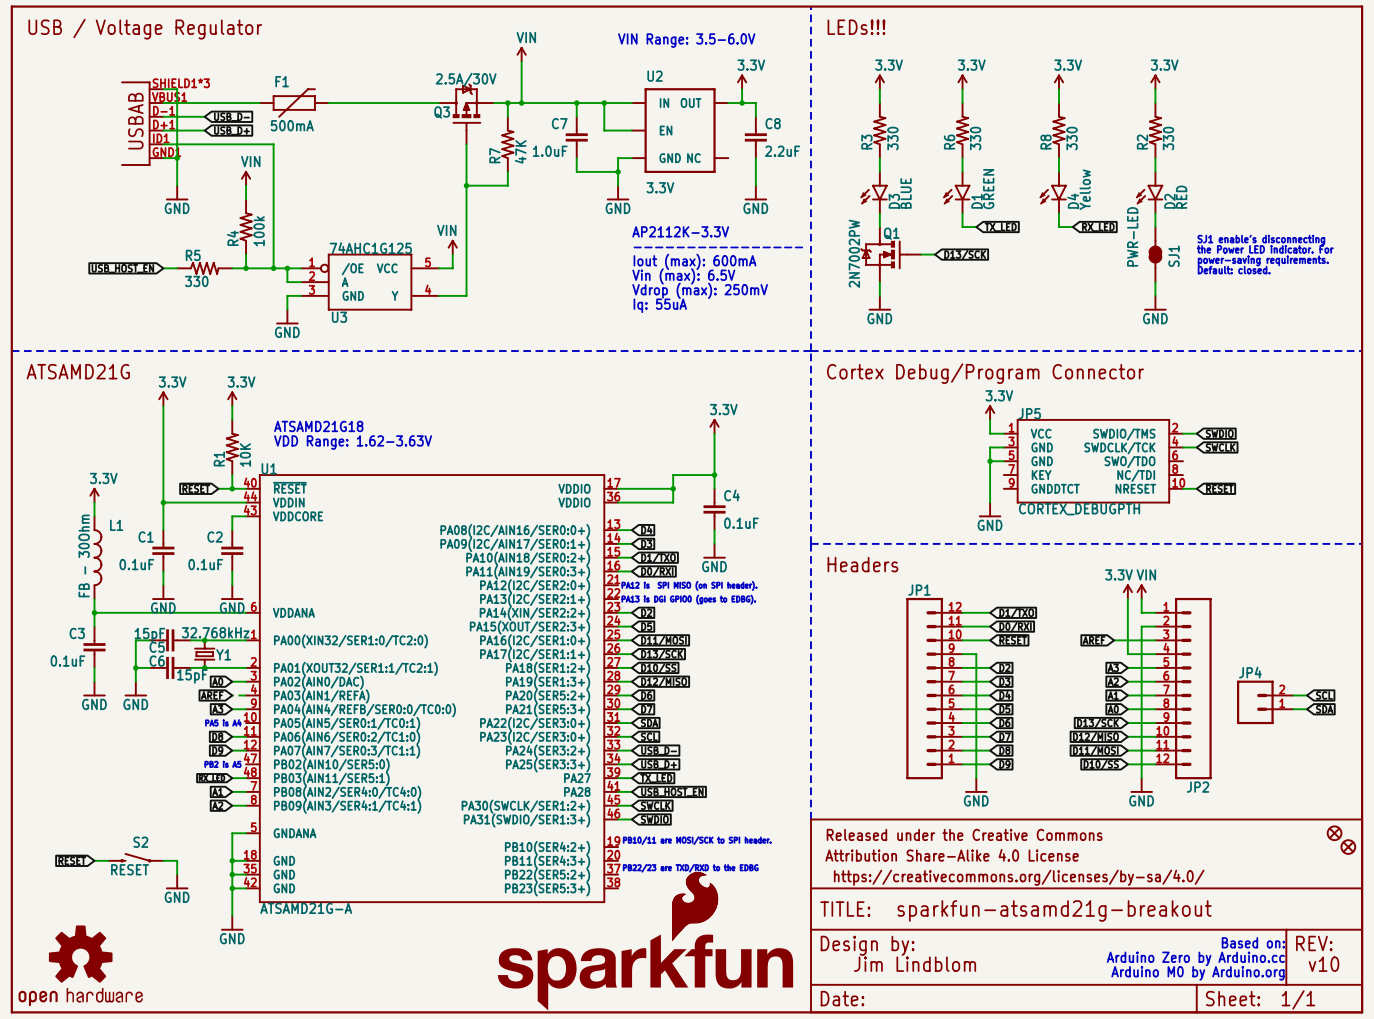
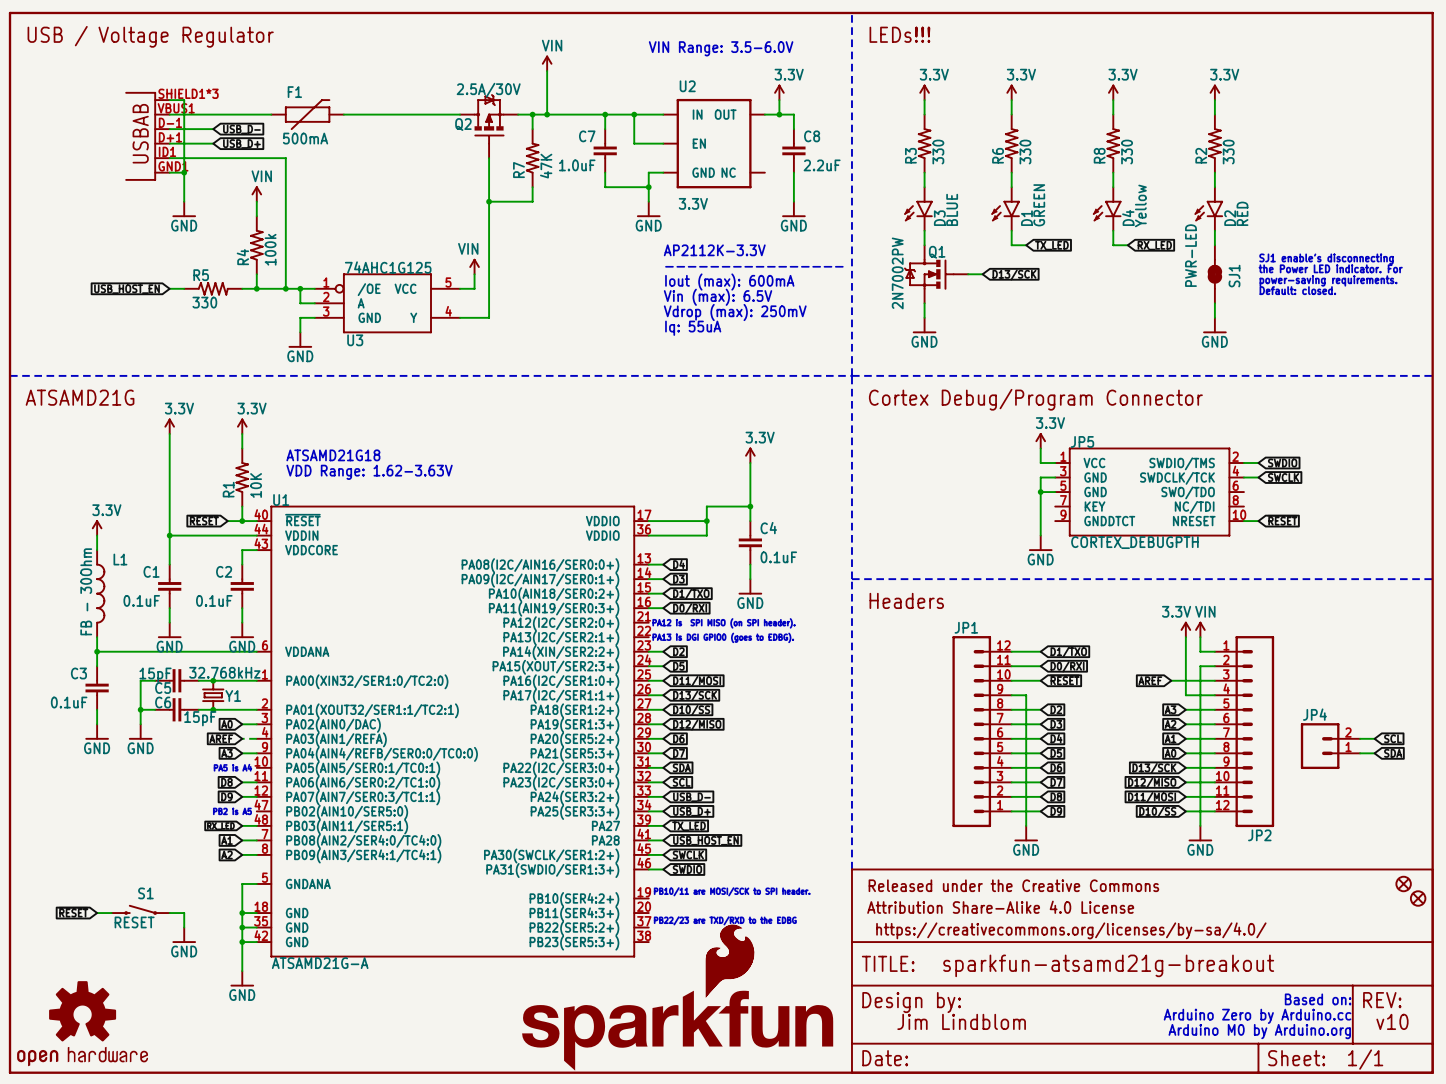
Q3 name: Q3 (442, 112) -> Q2 (463, 124)
S2 name: S2 (140, 842) -> S1 (145, 893)

